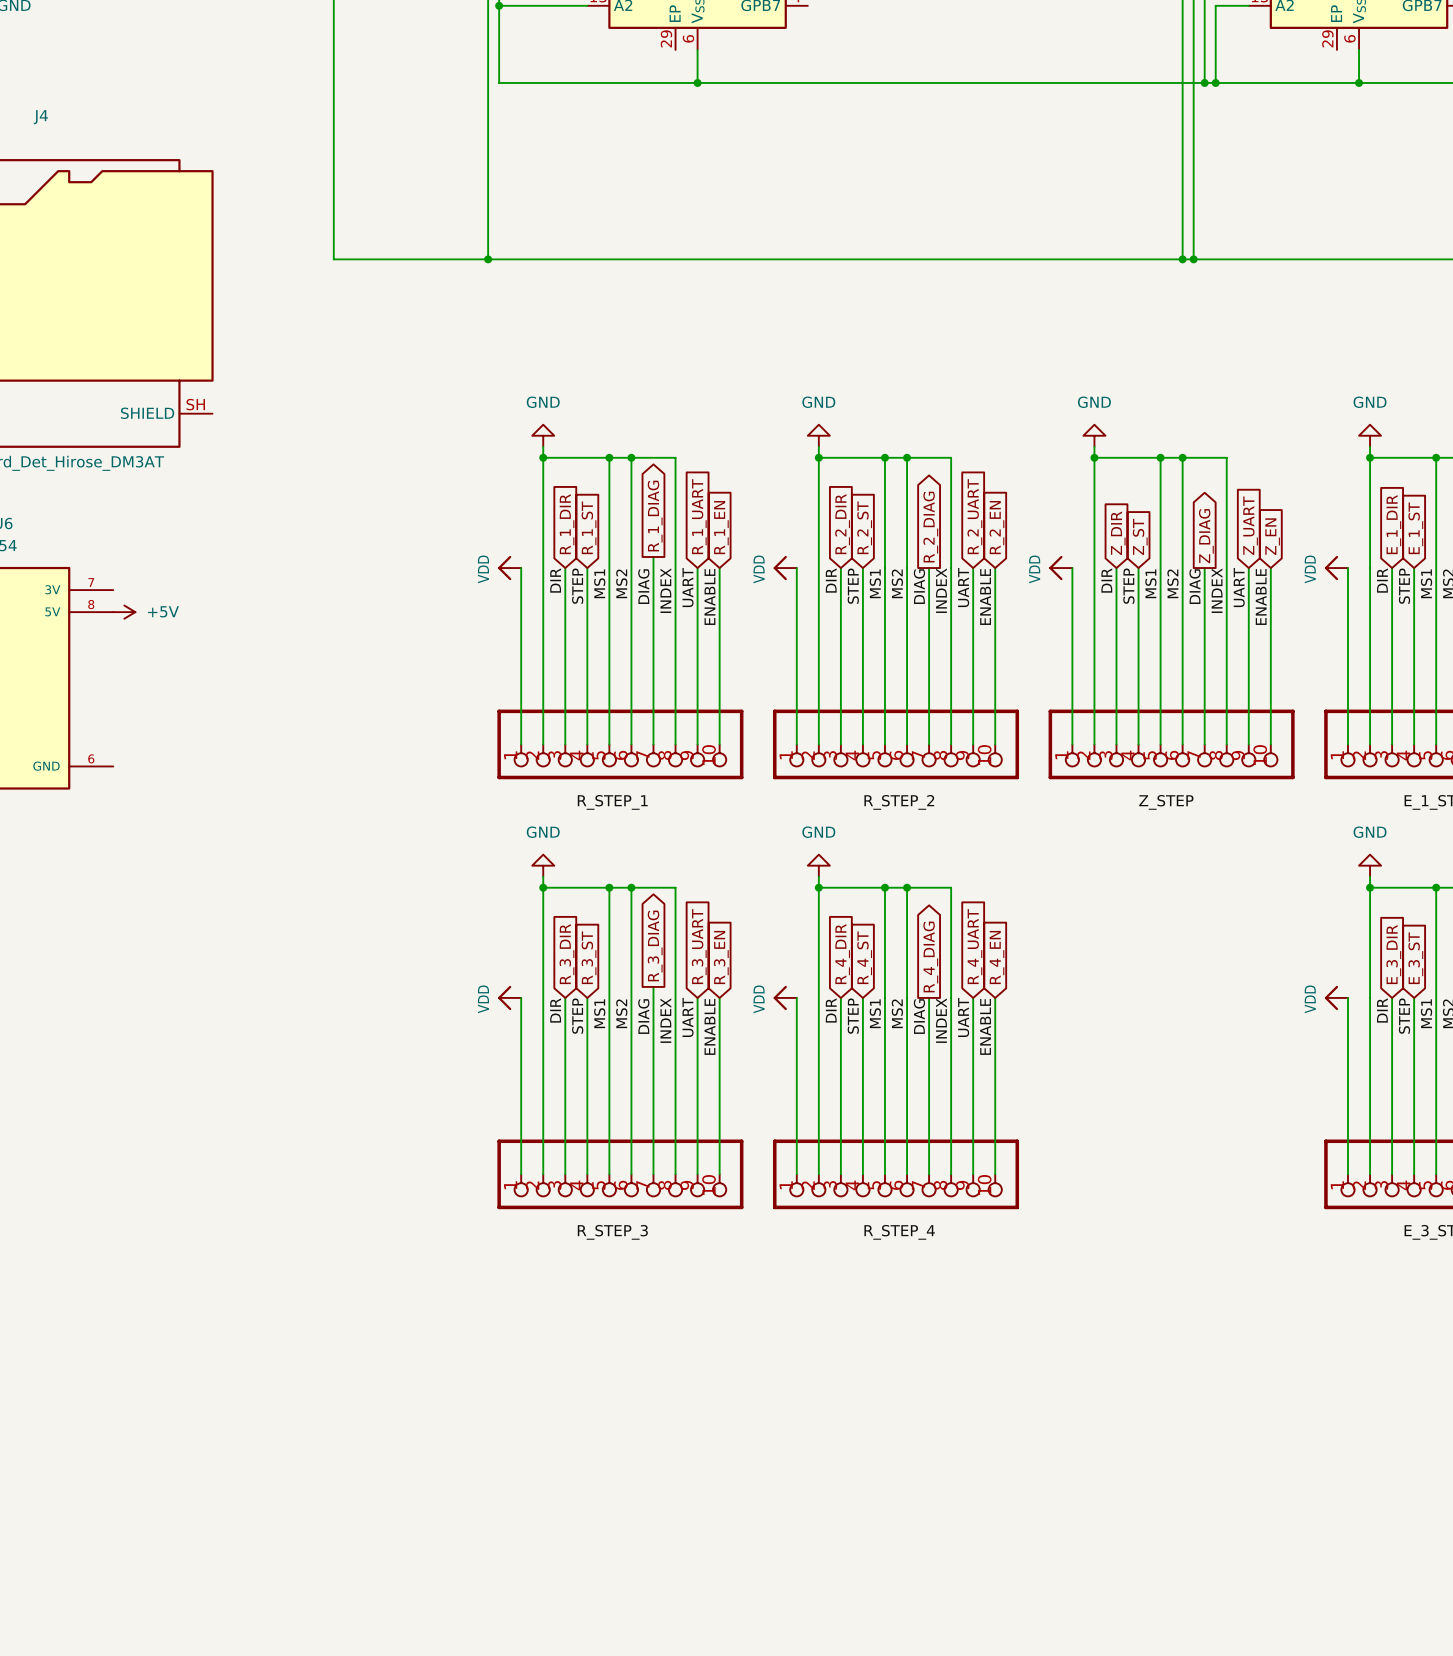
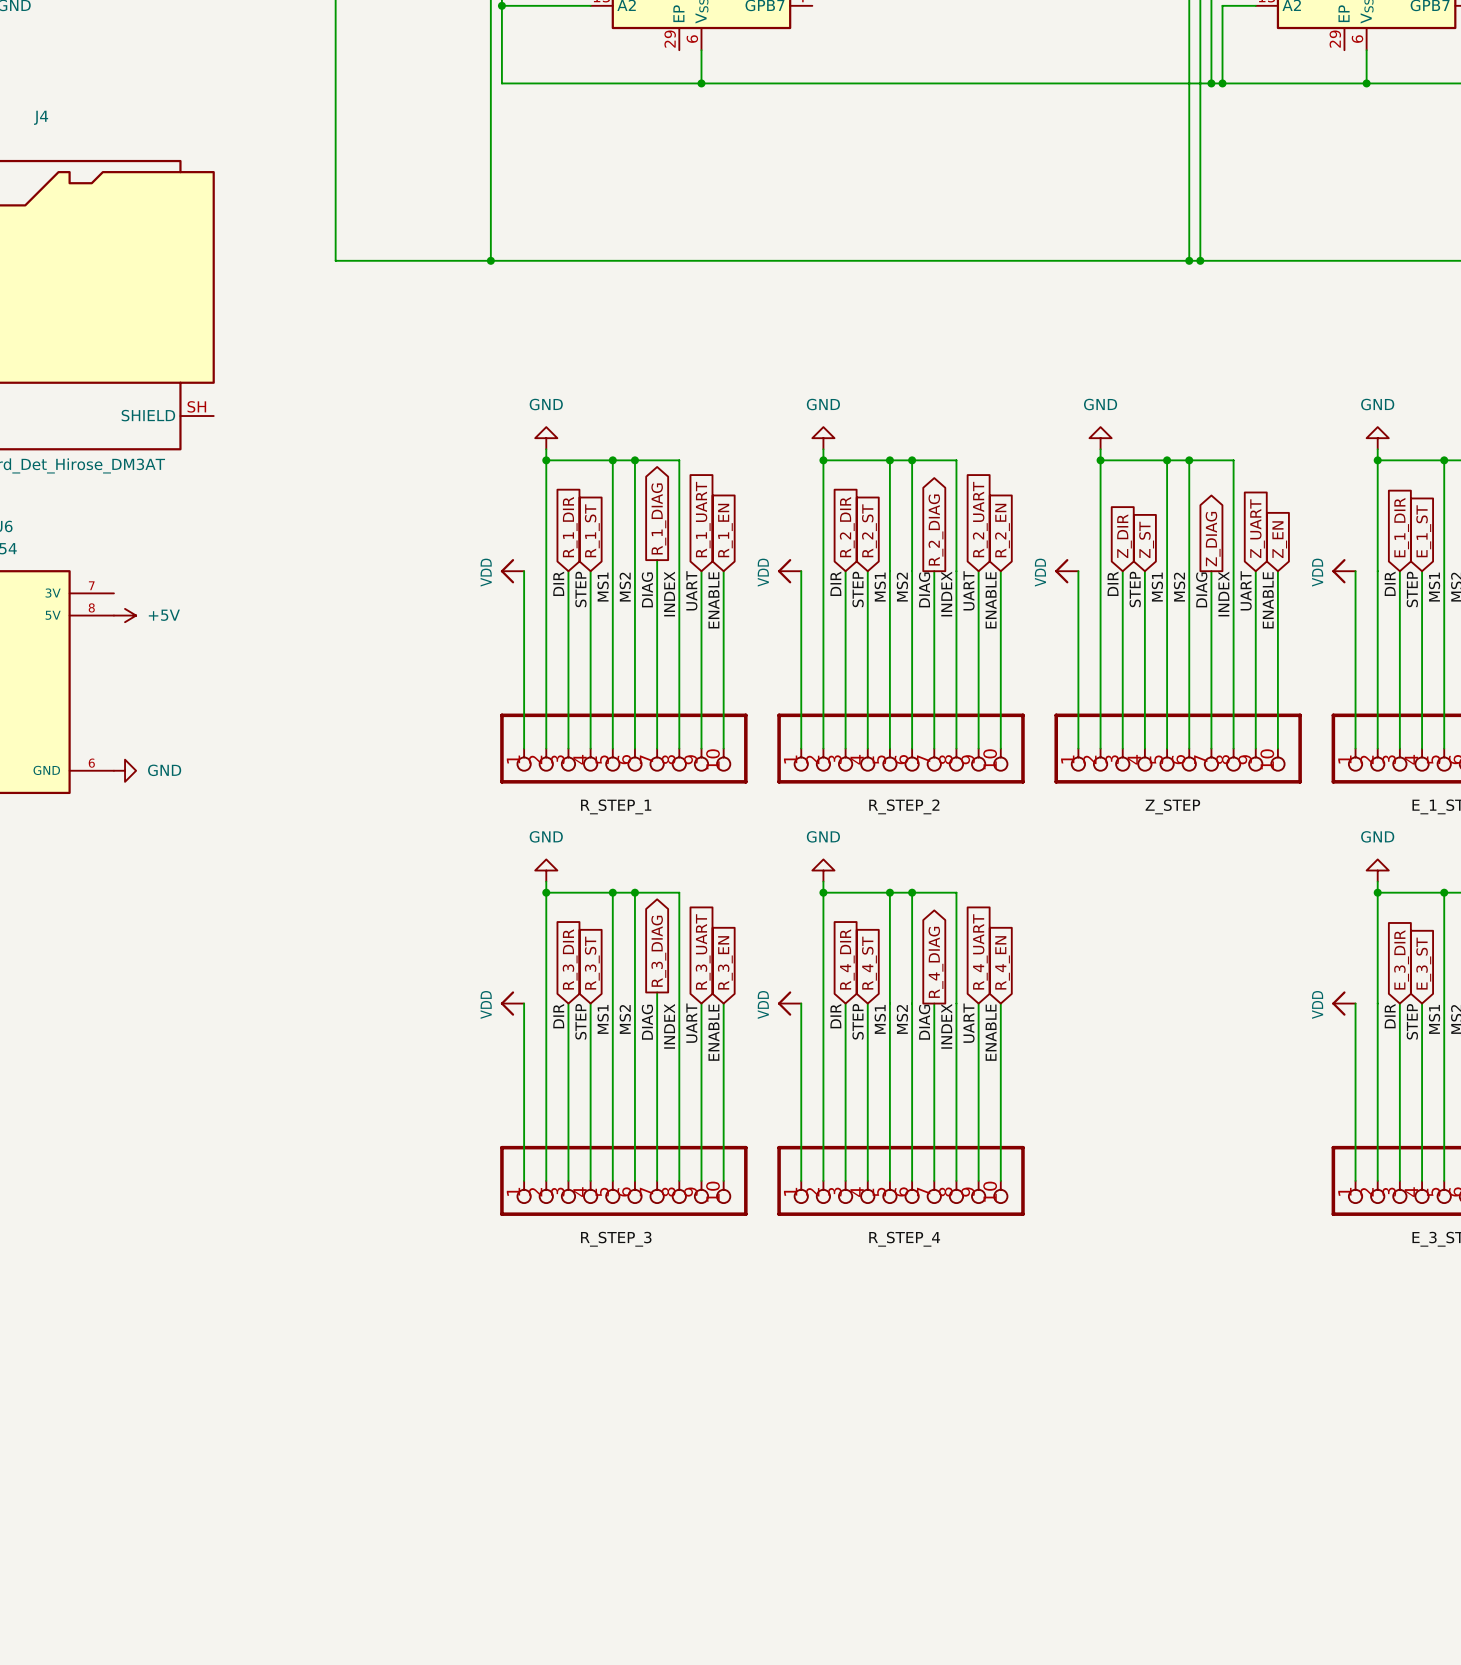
power symbol: none -> GND (125, 770)

